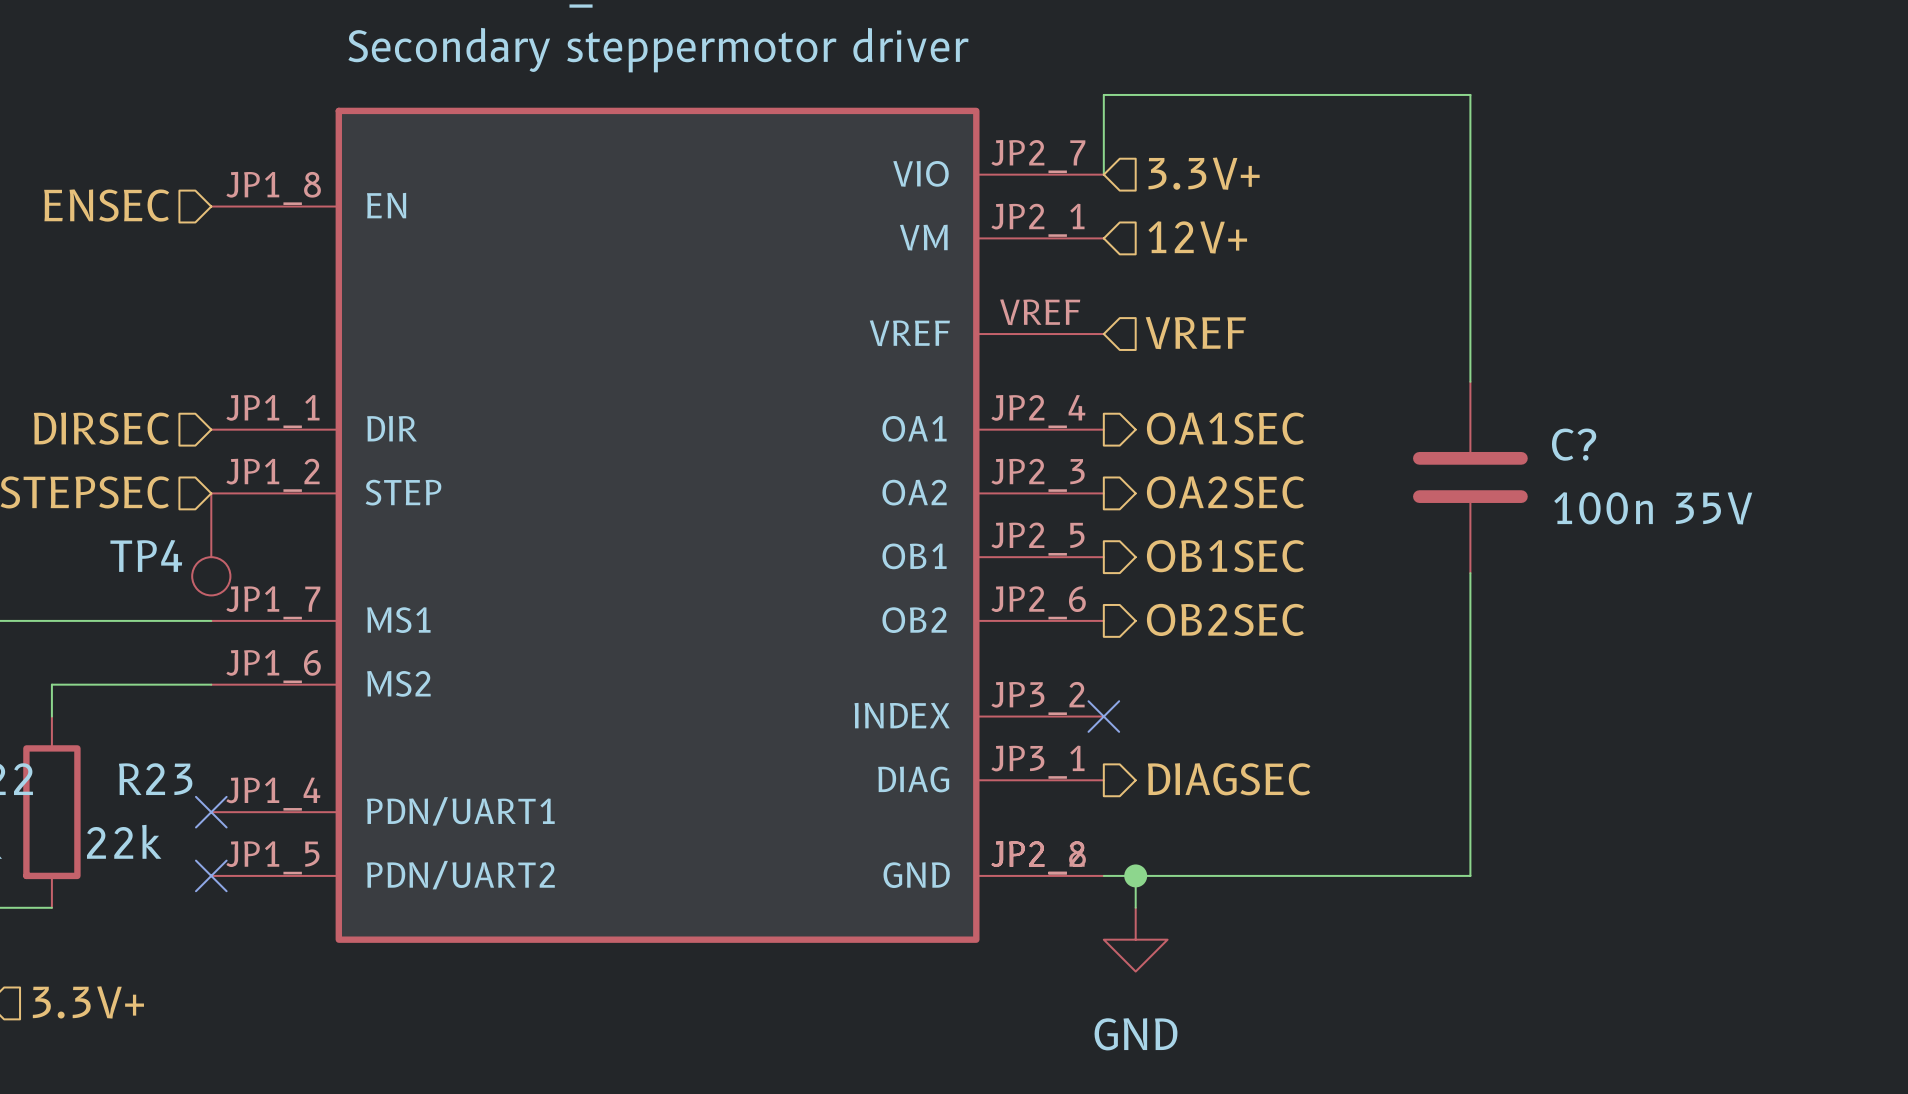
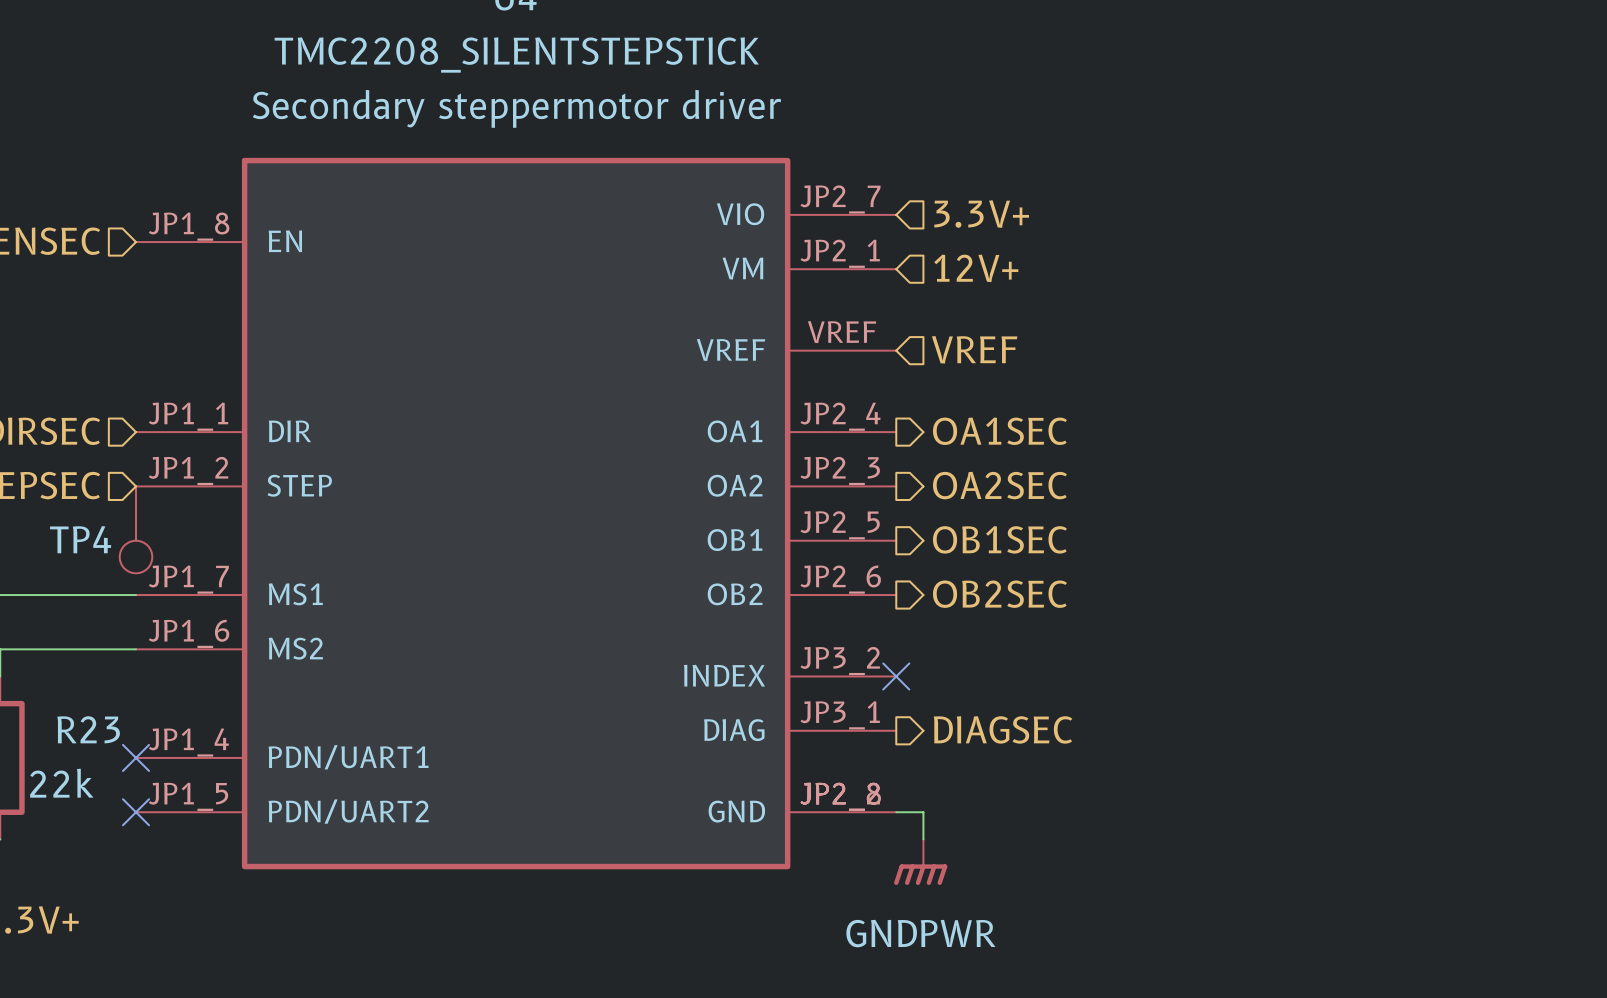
wire: (1103, 174) (1103, 94) (1470, 94) (1470, 381) -> none
C?: 100n 35V (1470, 477) -> none
wire: (1470, 573) (1470, 875) (1135, 875) -> none
junction: (1135, 875) -> none
power symbol: GND (1135, 939) -> GNDPWR (920, 862)

